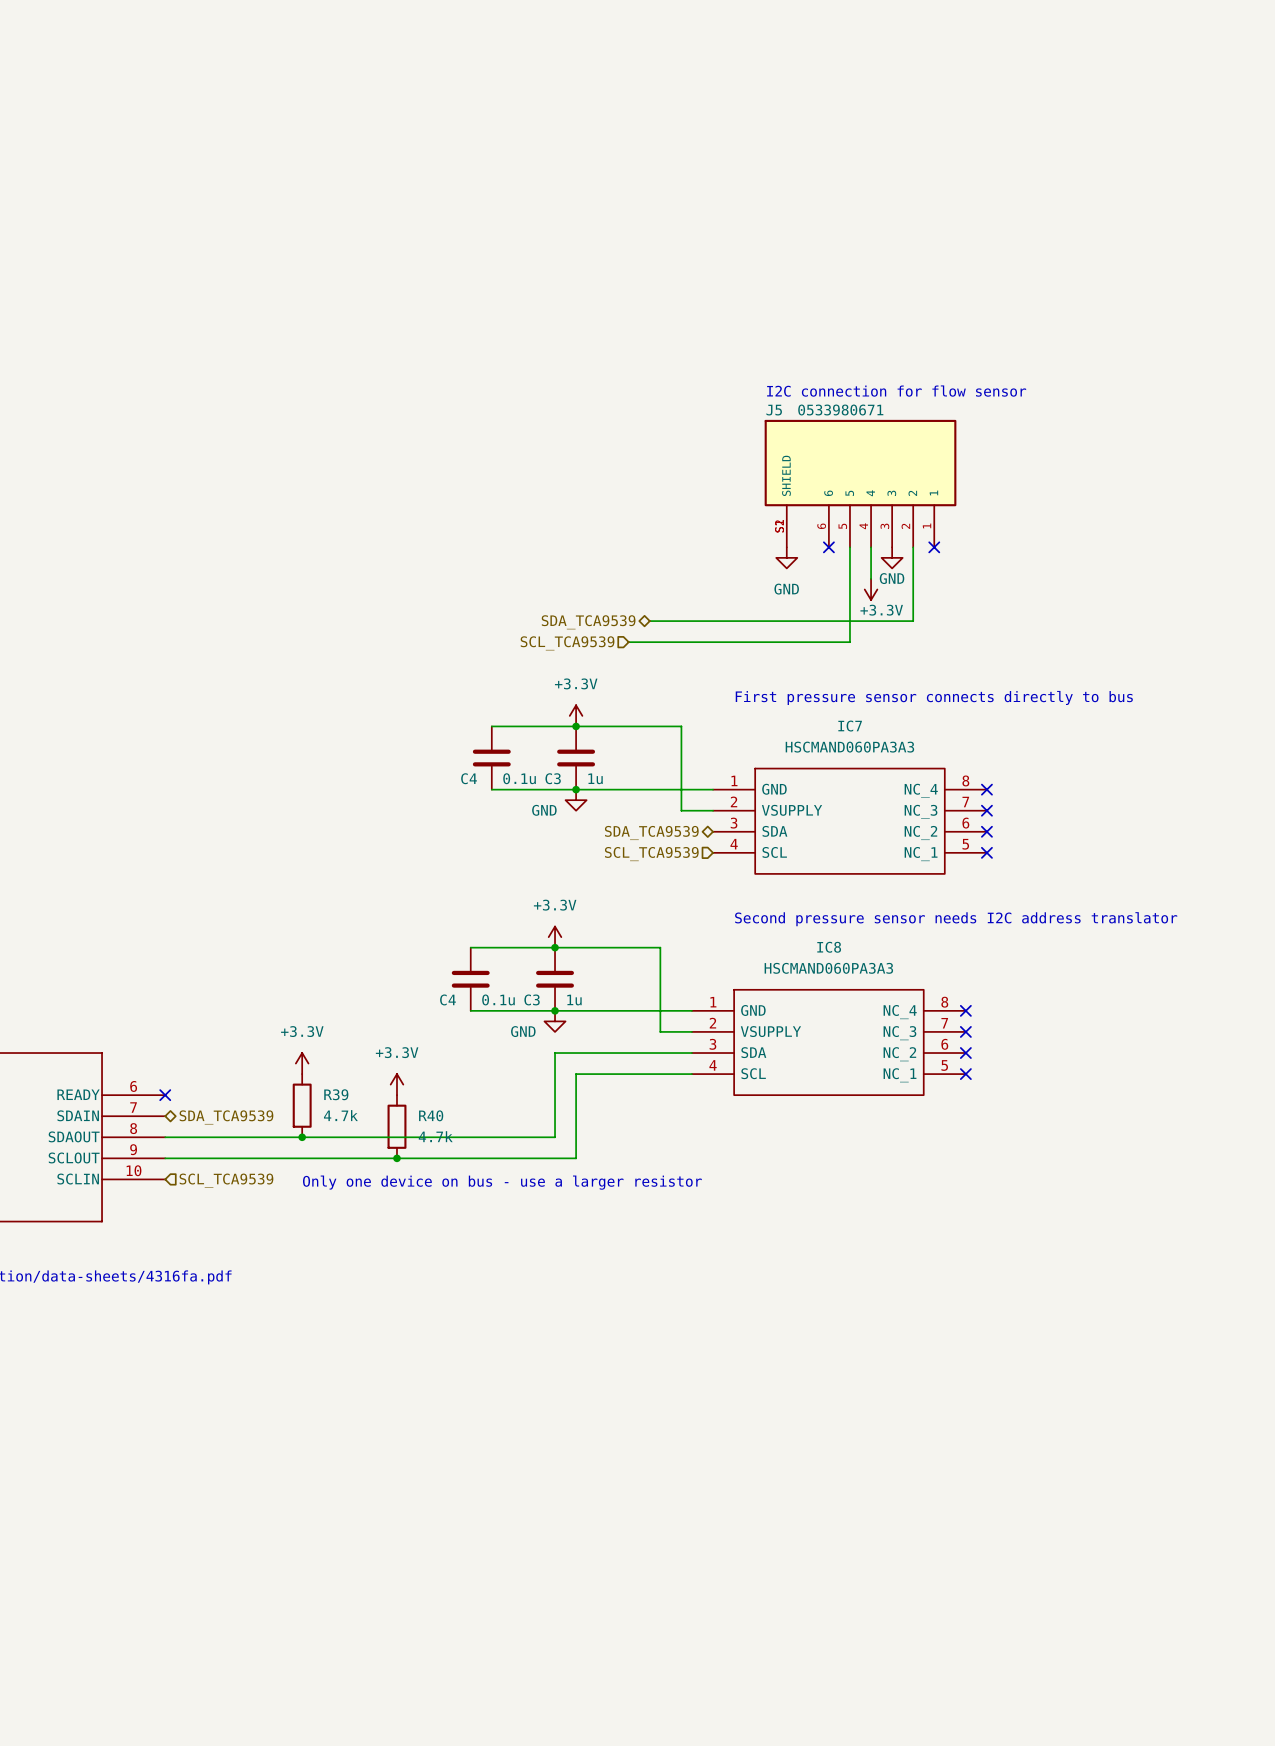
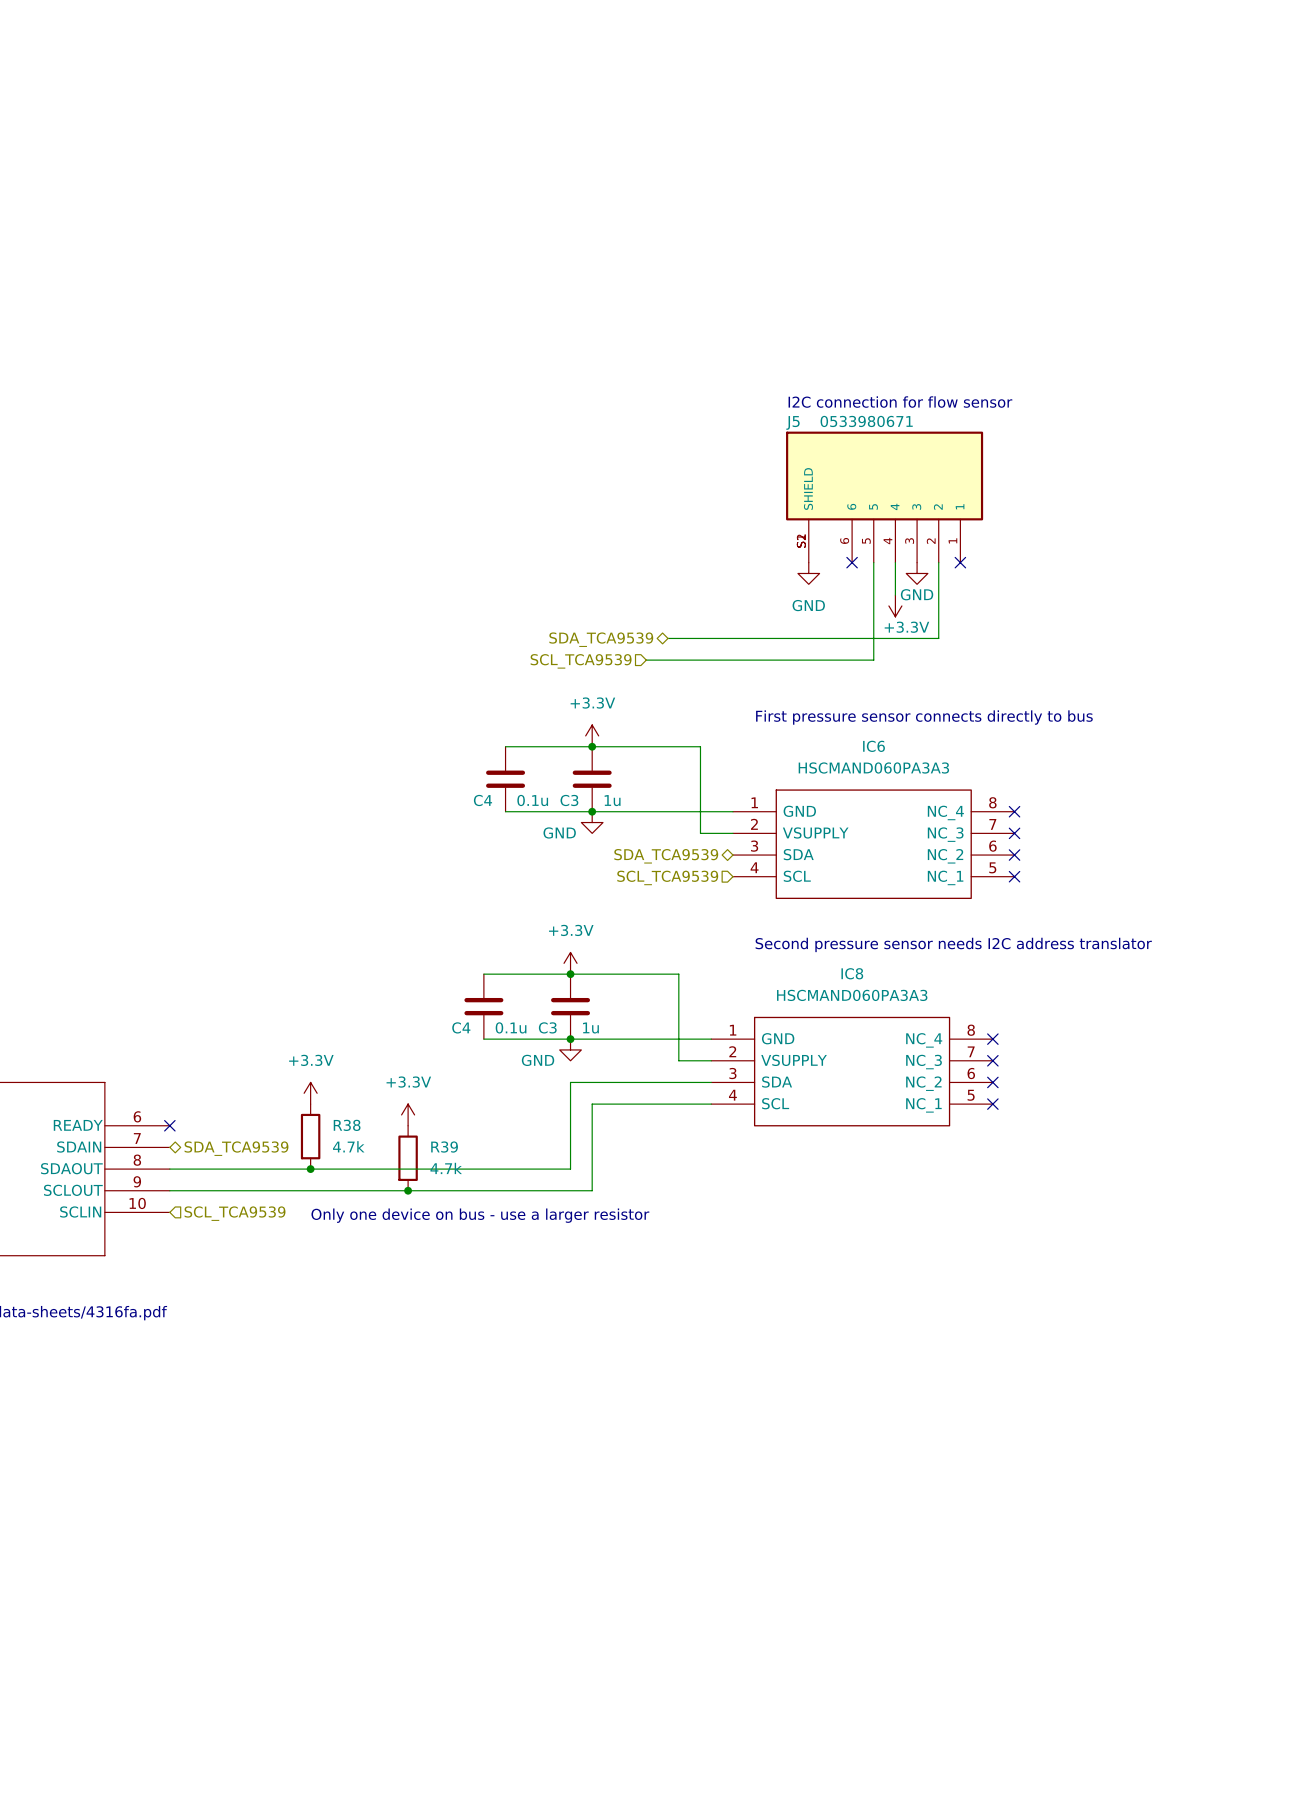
IC7 name: IC7 (850, 726) -> IC6 (874, 746)
R39 name: R39 (336, 1094) -> R38 (347, 1125)
R40 name: R40 (431, 1115) -> R39 (444, 1147)

